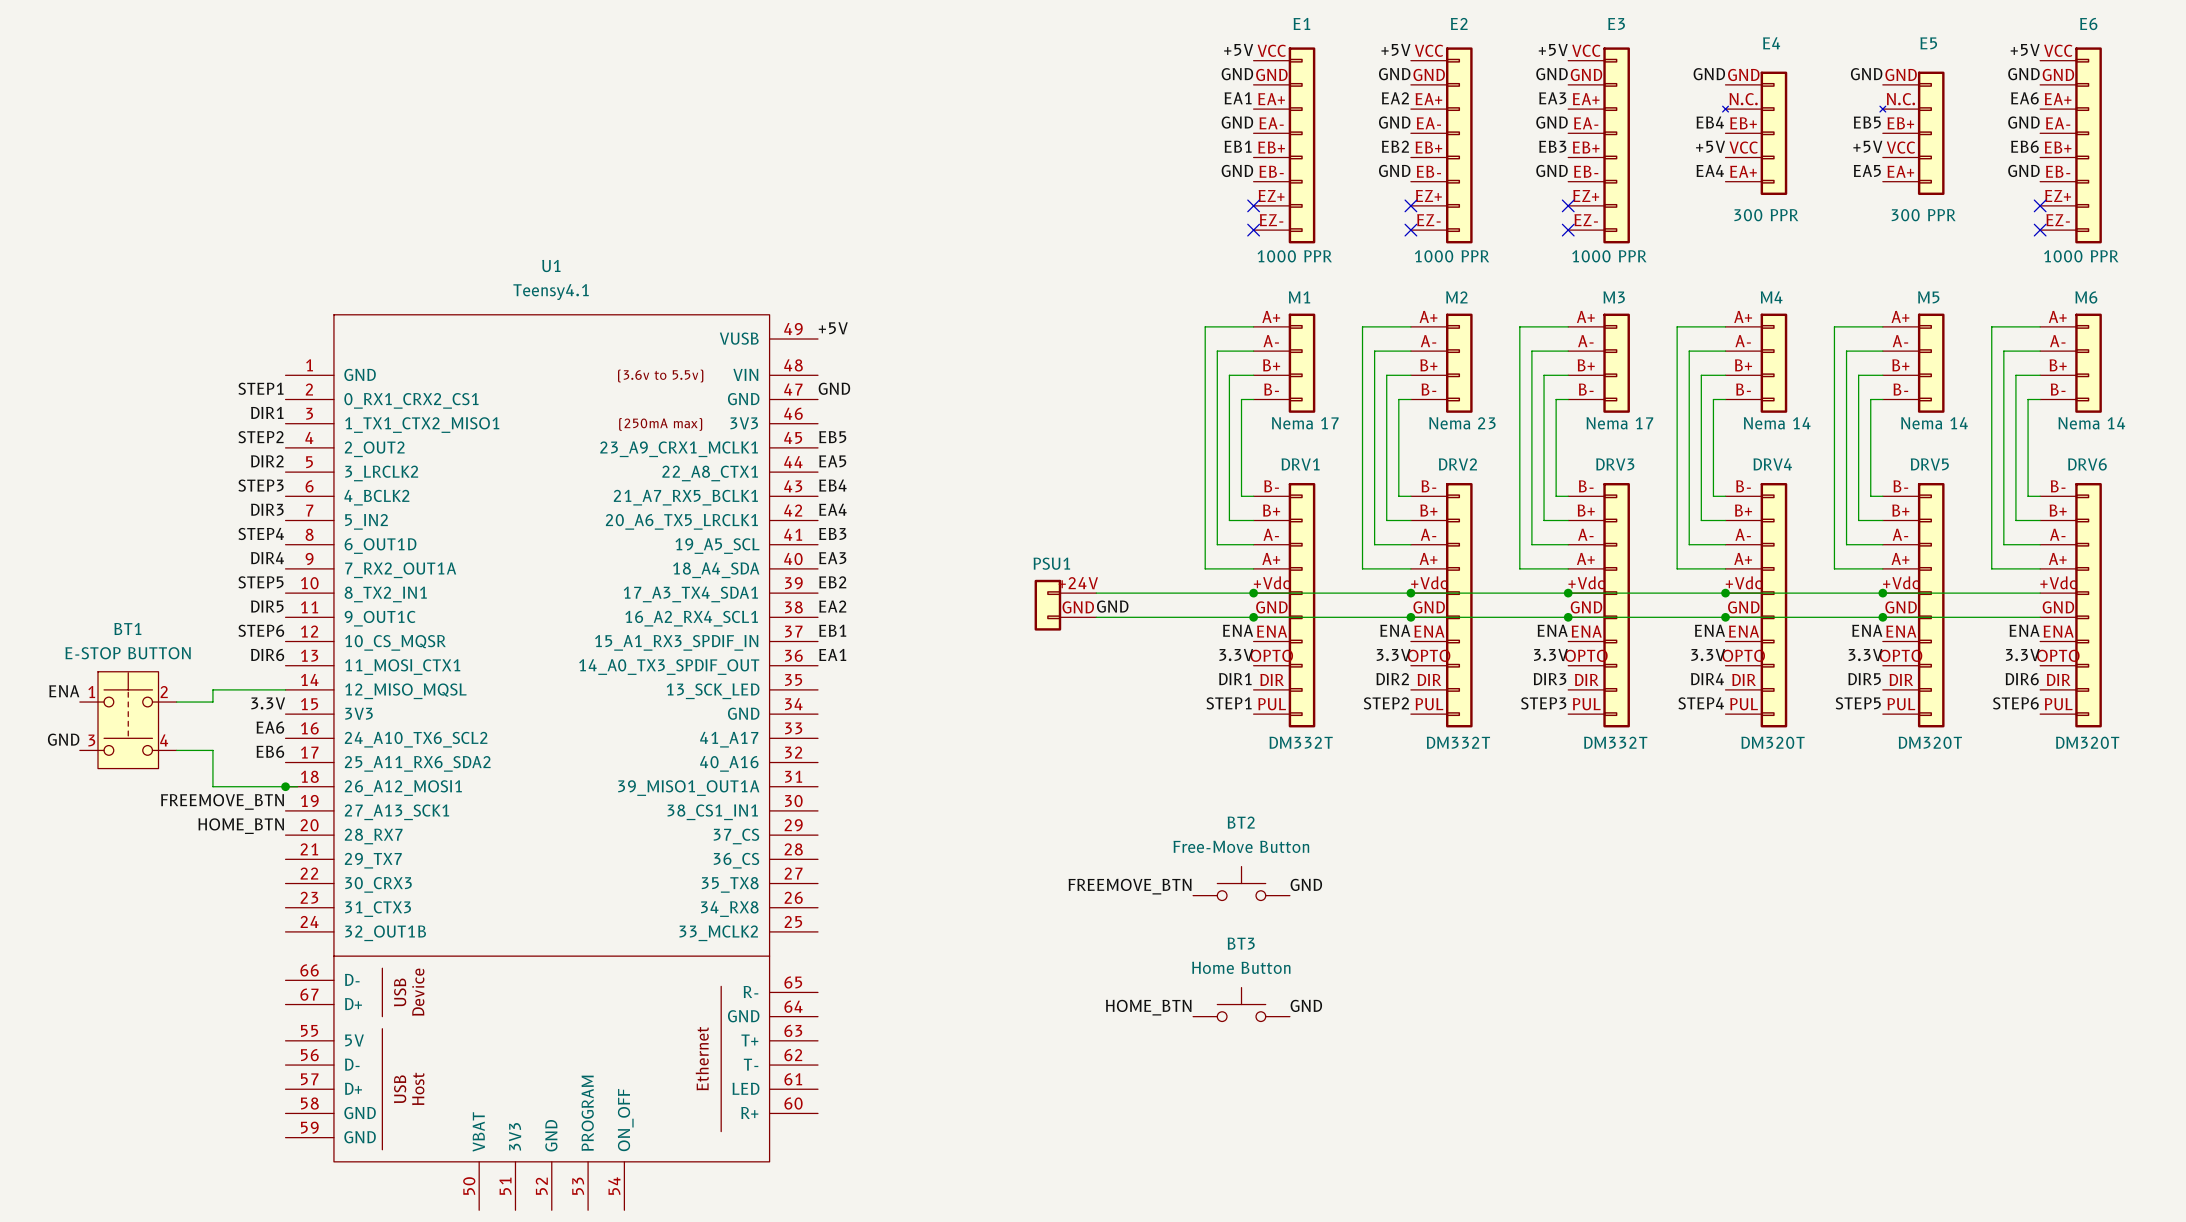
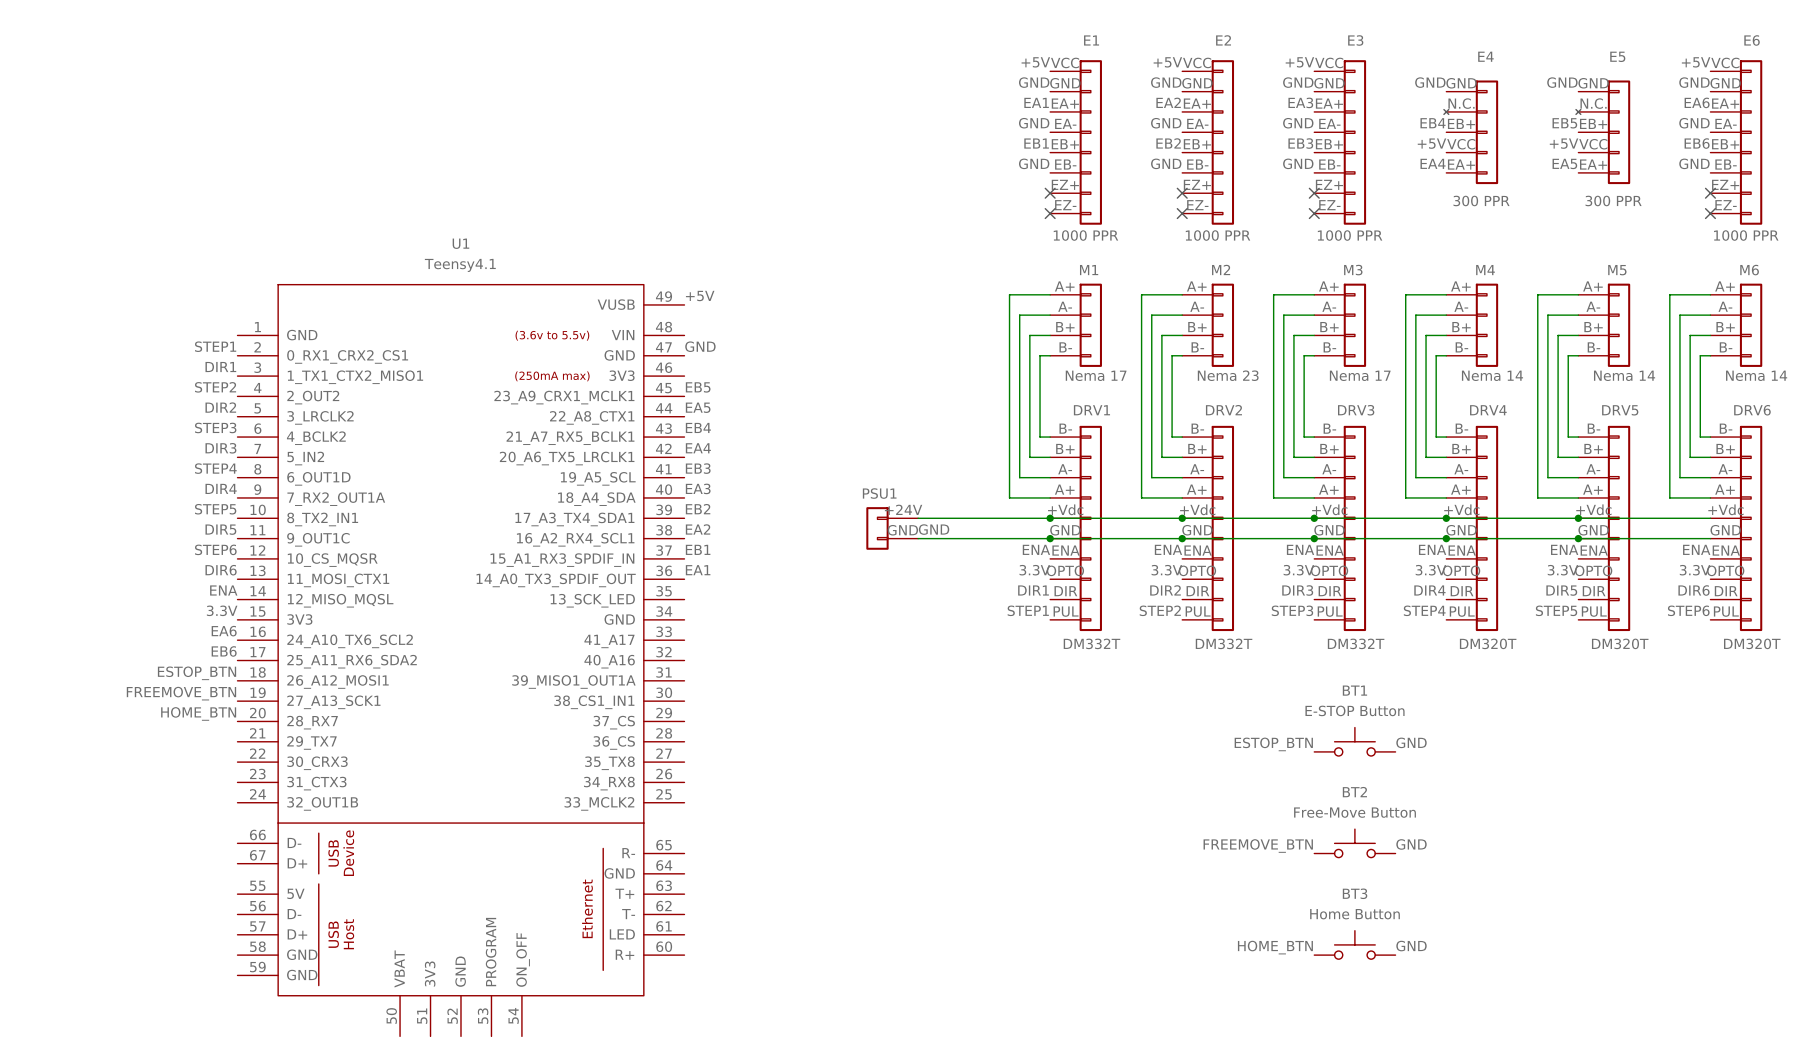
BT1 name position: BT1 (127, 628) -> BT1 (1354, 690)
BT1 value: E-STOP BUTTON (128, 653) -> E-STOP Button (1355, 710)
BT1 symbol: [79, 671, 177, 769] -> [1314, 727, 1396, 757]
wire: (285, 689) (212, 689) (212, 702) (176, 702) -> none
label position: ENA (64, 691) -> ENA (223, 590)
label: GND (63, 739) -> none
wire: (176, 750) (212, 750) (212, 786) (297, 786) -> none
label: none -> ESTOP_BTN (197, 673)
junction: (285, 786) -> none
label: none -> GND (1411, 742)
label: none -> ESTOP_BTN (1273, 744)
BT2 position: (1241, 883) -> (1354, 843)
label: GND (1306, 884) -> none
label: FREEMOVE_BTN (1130, 886) -> none
label: none -> GND (1411, 844)
label: none -> FREEMOVE_BTN (1258, 846)
BT3 position: (1241, 1004) -> (1354, 944)
label: GND (1306, 1005) -> none
label: HOME_BTN (1148, 1007) -> none
label: none -> GND (1411, 946)
label: none -> HOME_BTN (1275, 947)

